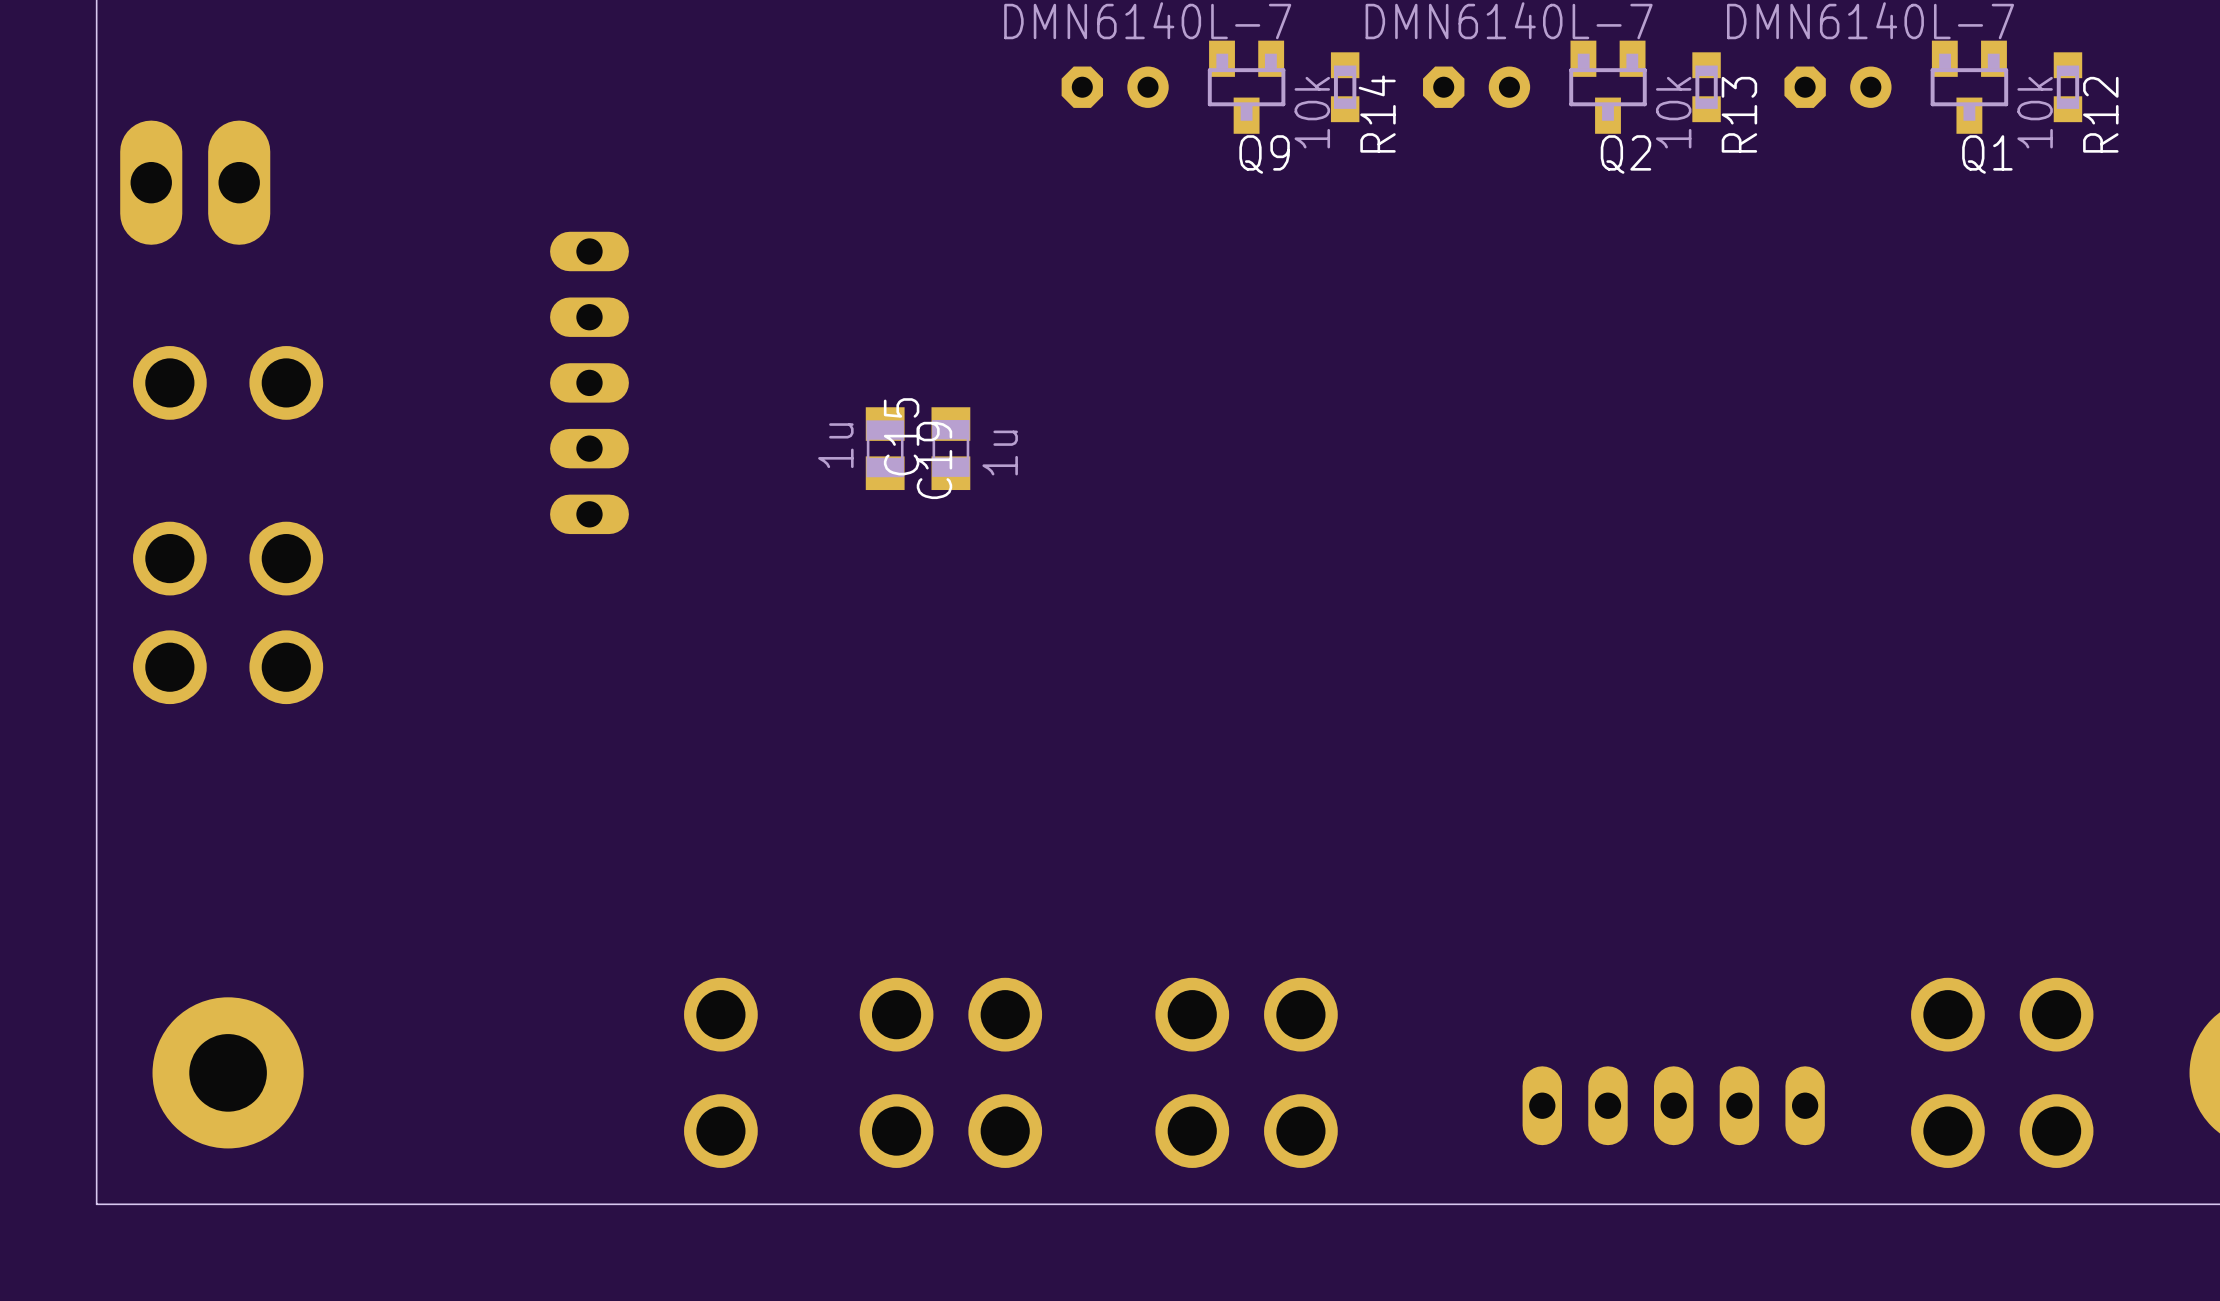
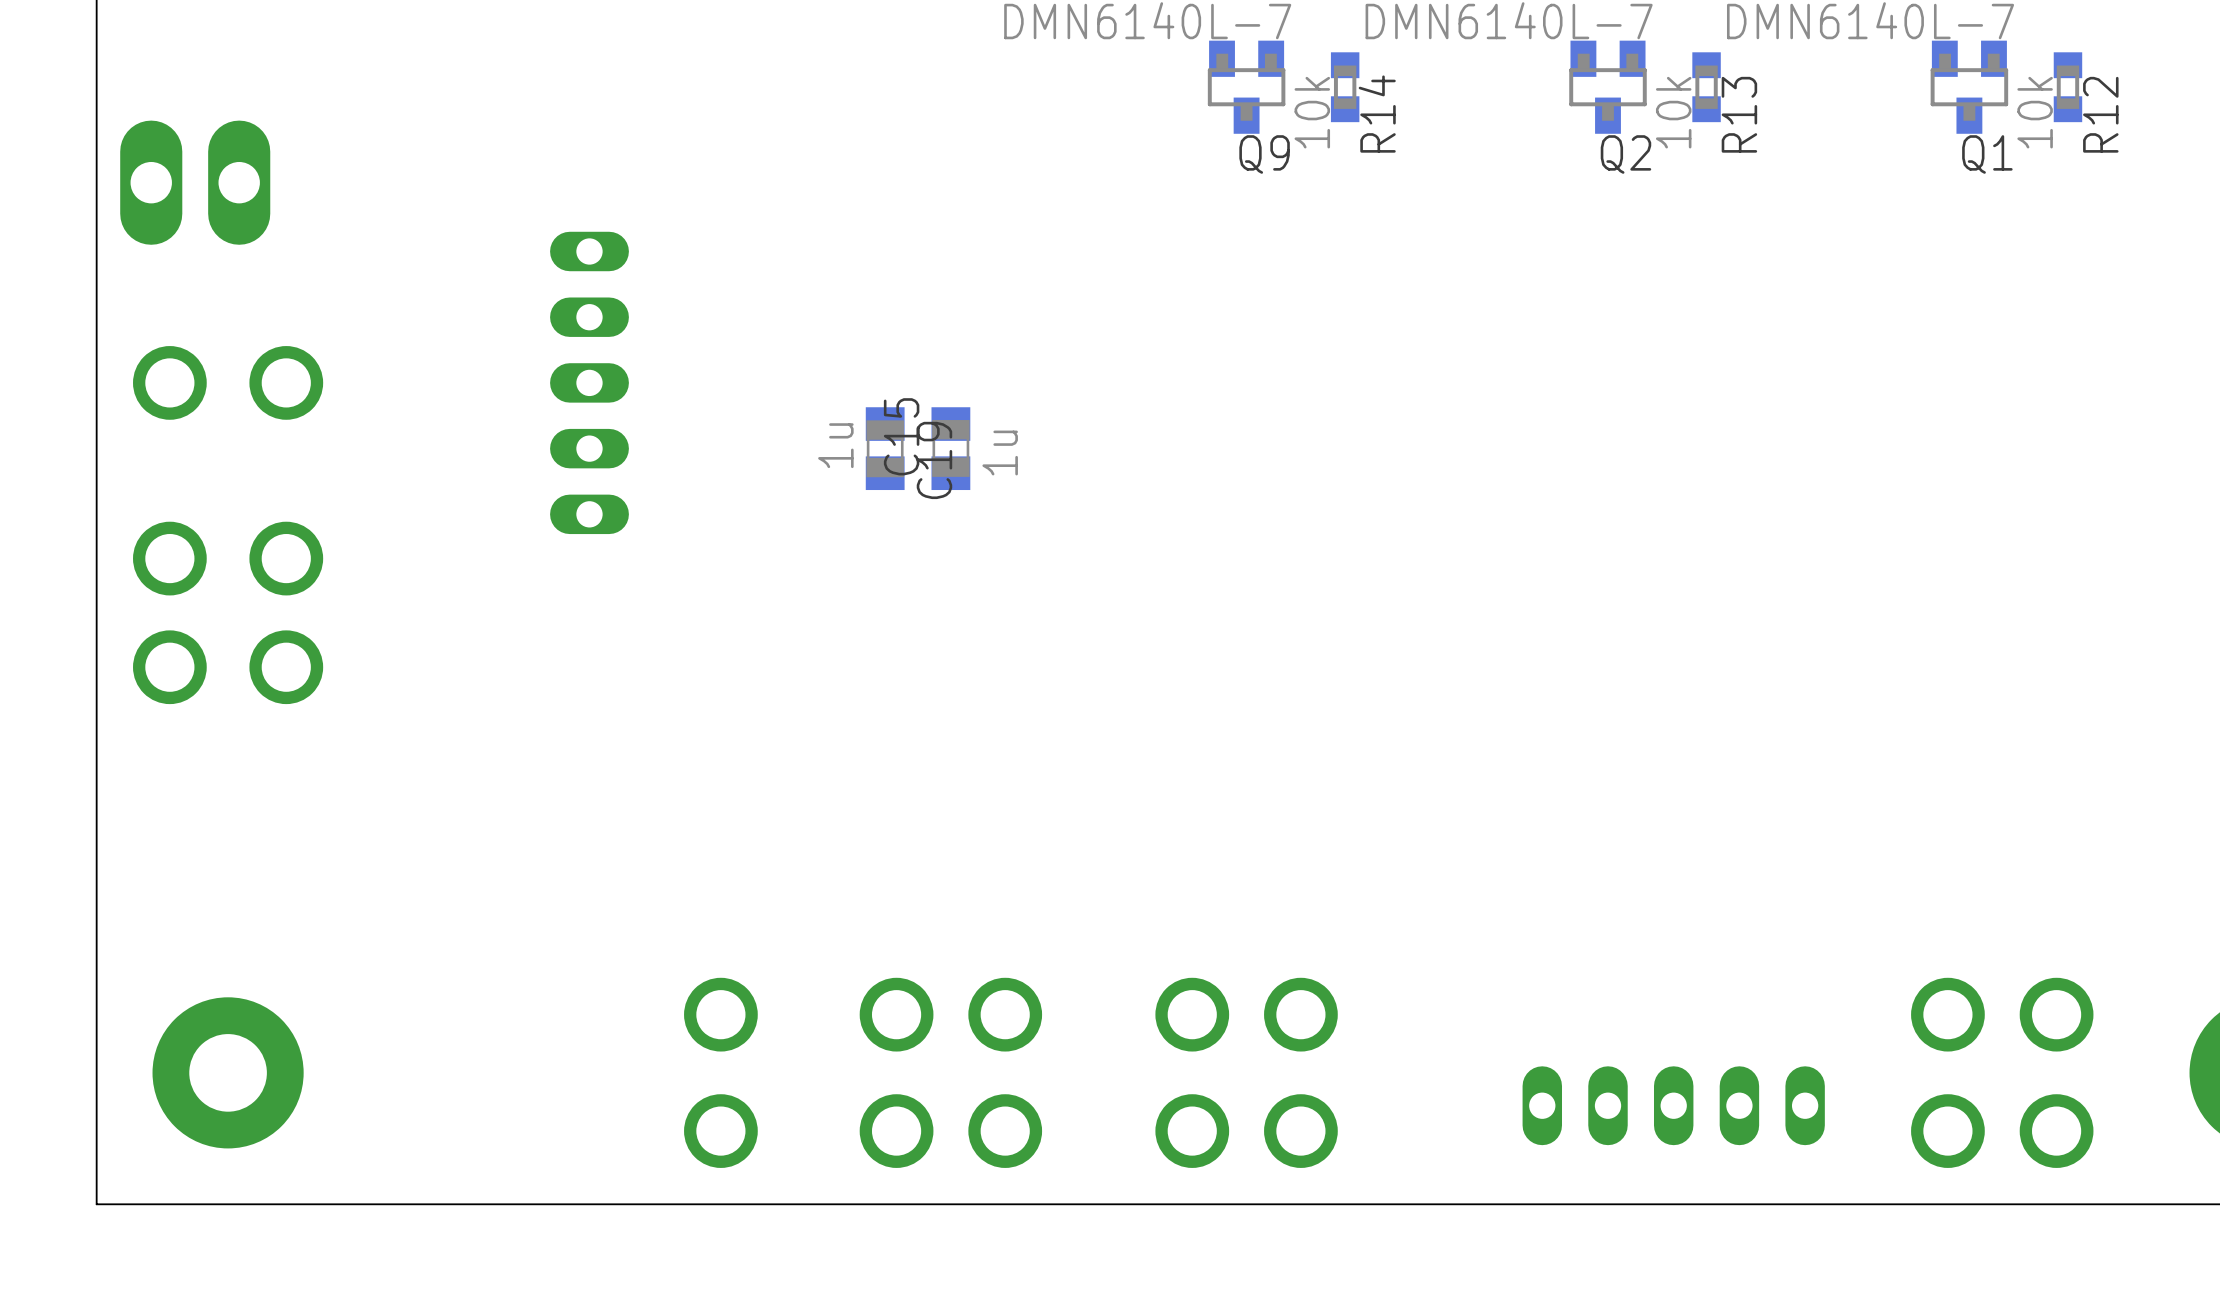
part: (1115, 87) -> none
part: (1476, 87) -> none
part: (1837, 87) -> none

